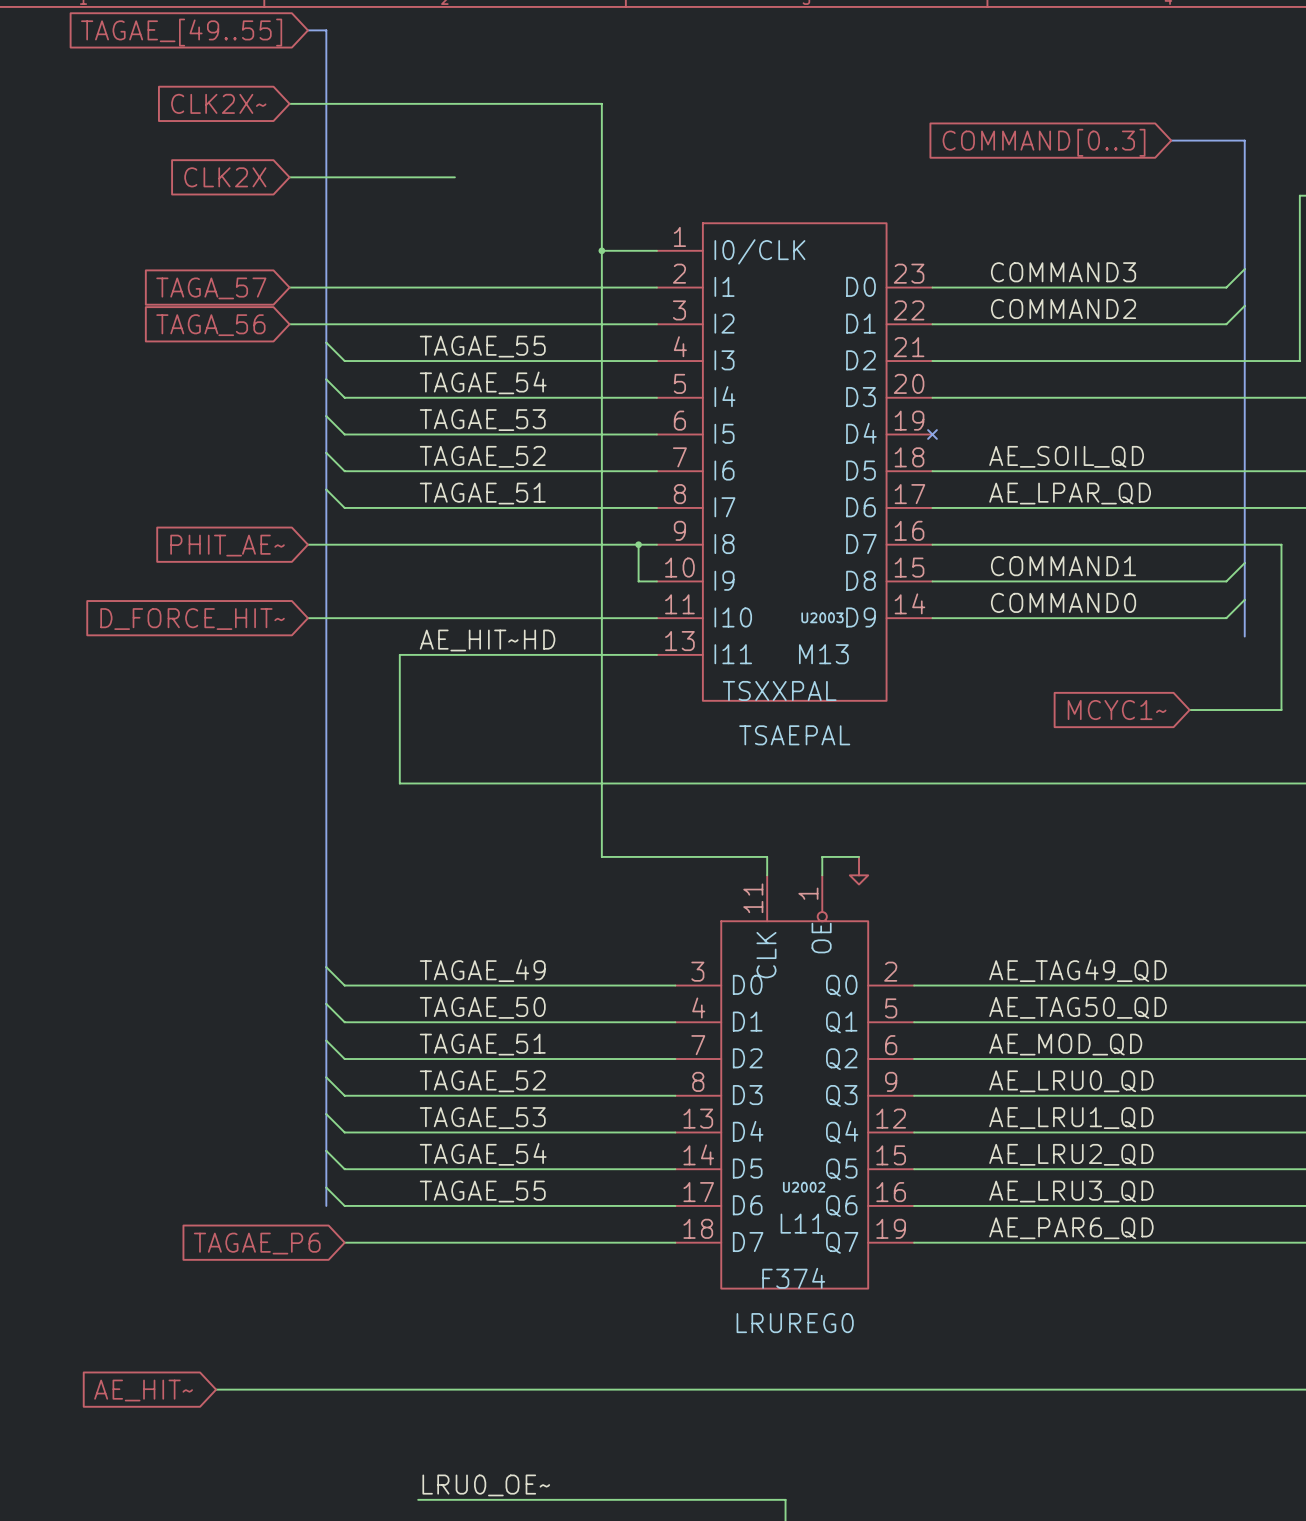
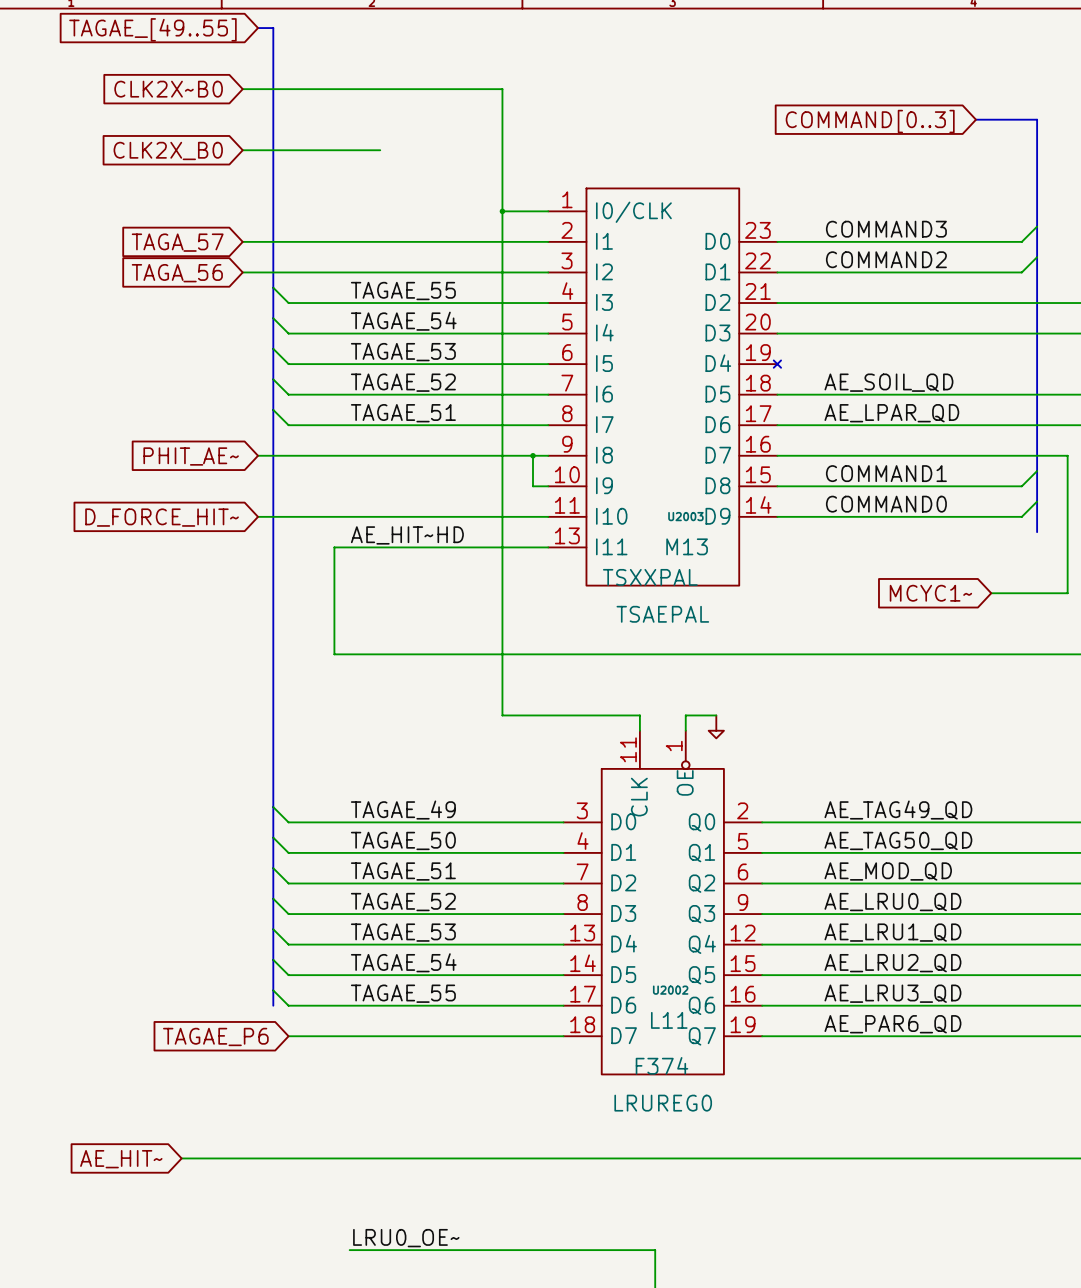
global label: CLK2X~ (218, 103) -> CLK2X~B0 (168, 89)
global label: CLK2X (225, 177) -> CLK2X_B0 (168, 150)

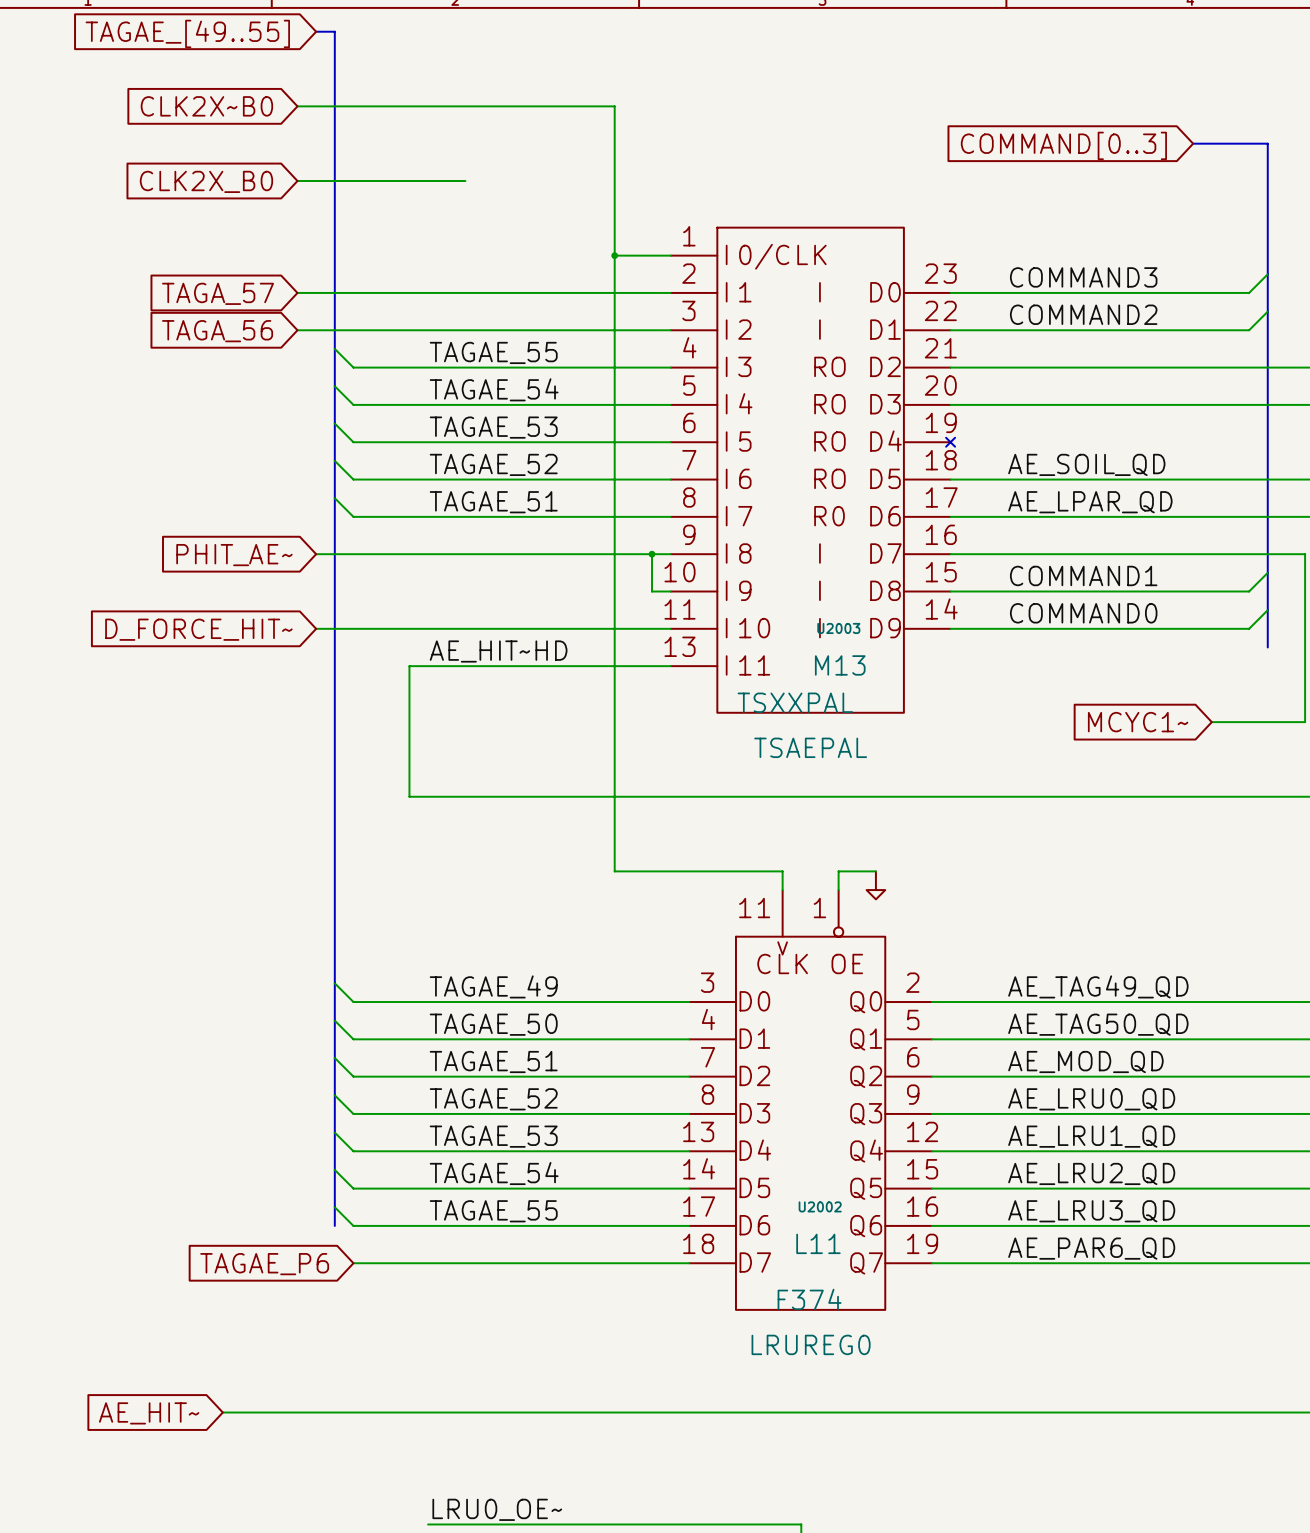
U2003 symbol: [548, 188, 778, 586] -> [670, 227, 951, 713]
U2002 symbol: [563, 730, 763, 1075] -> [689, 890, 932, 1310]

